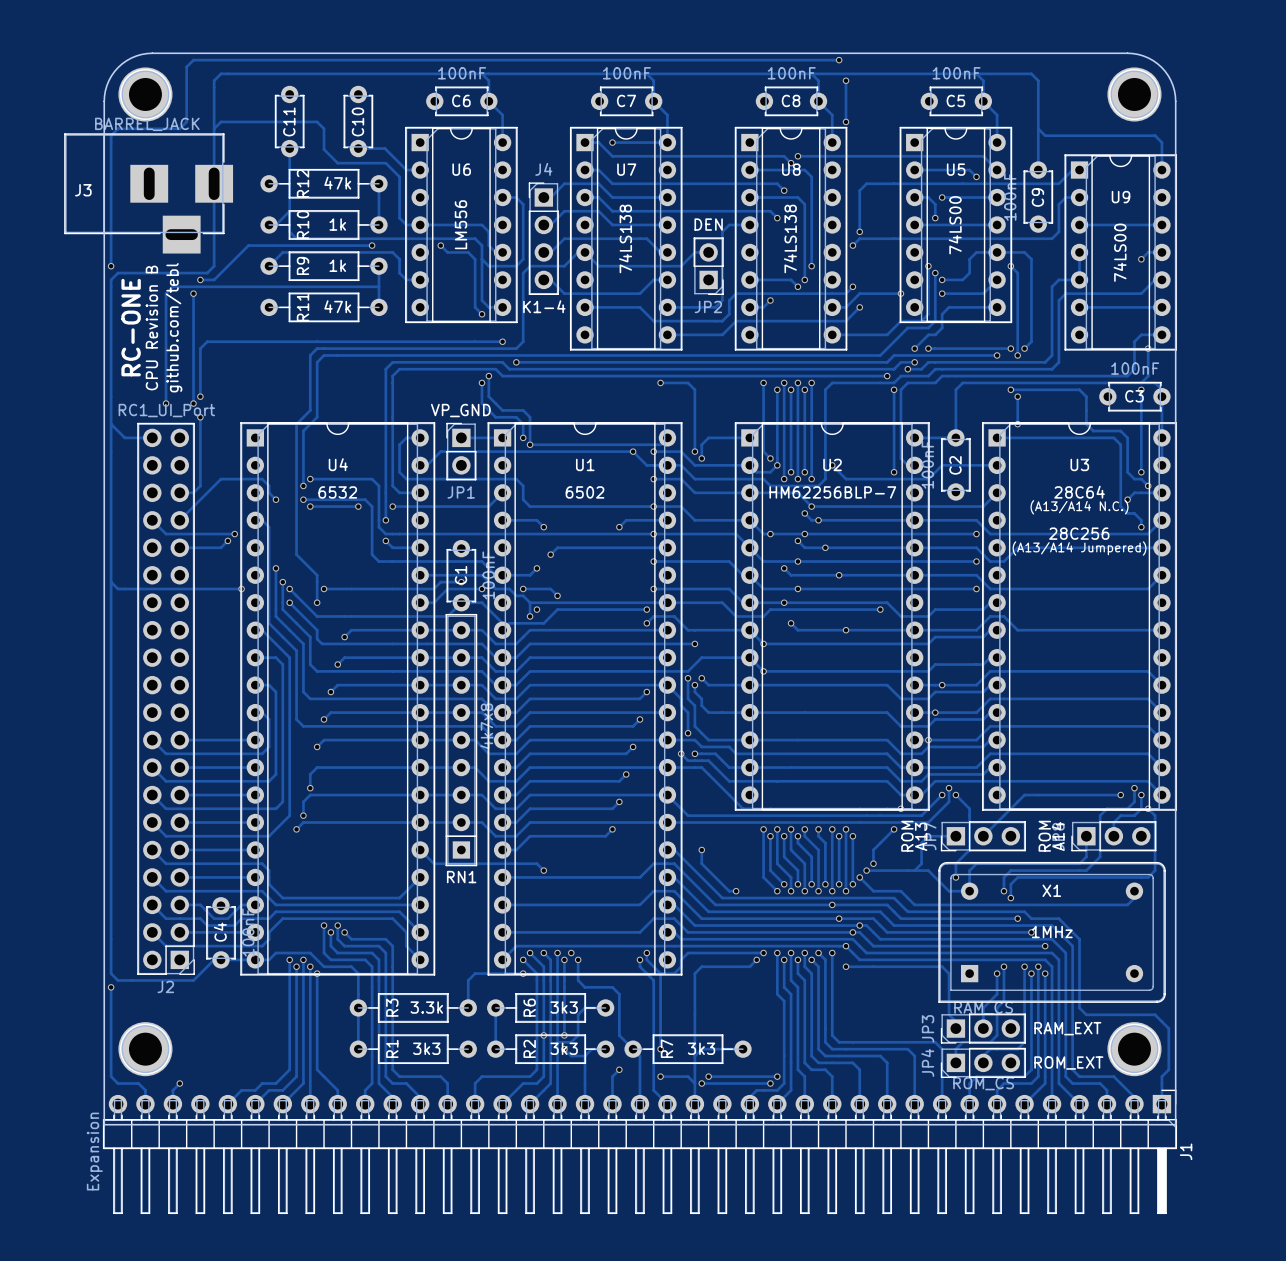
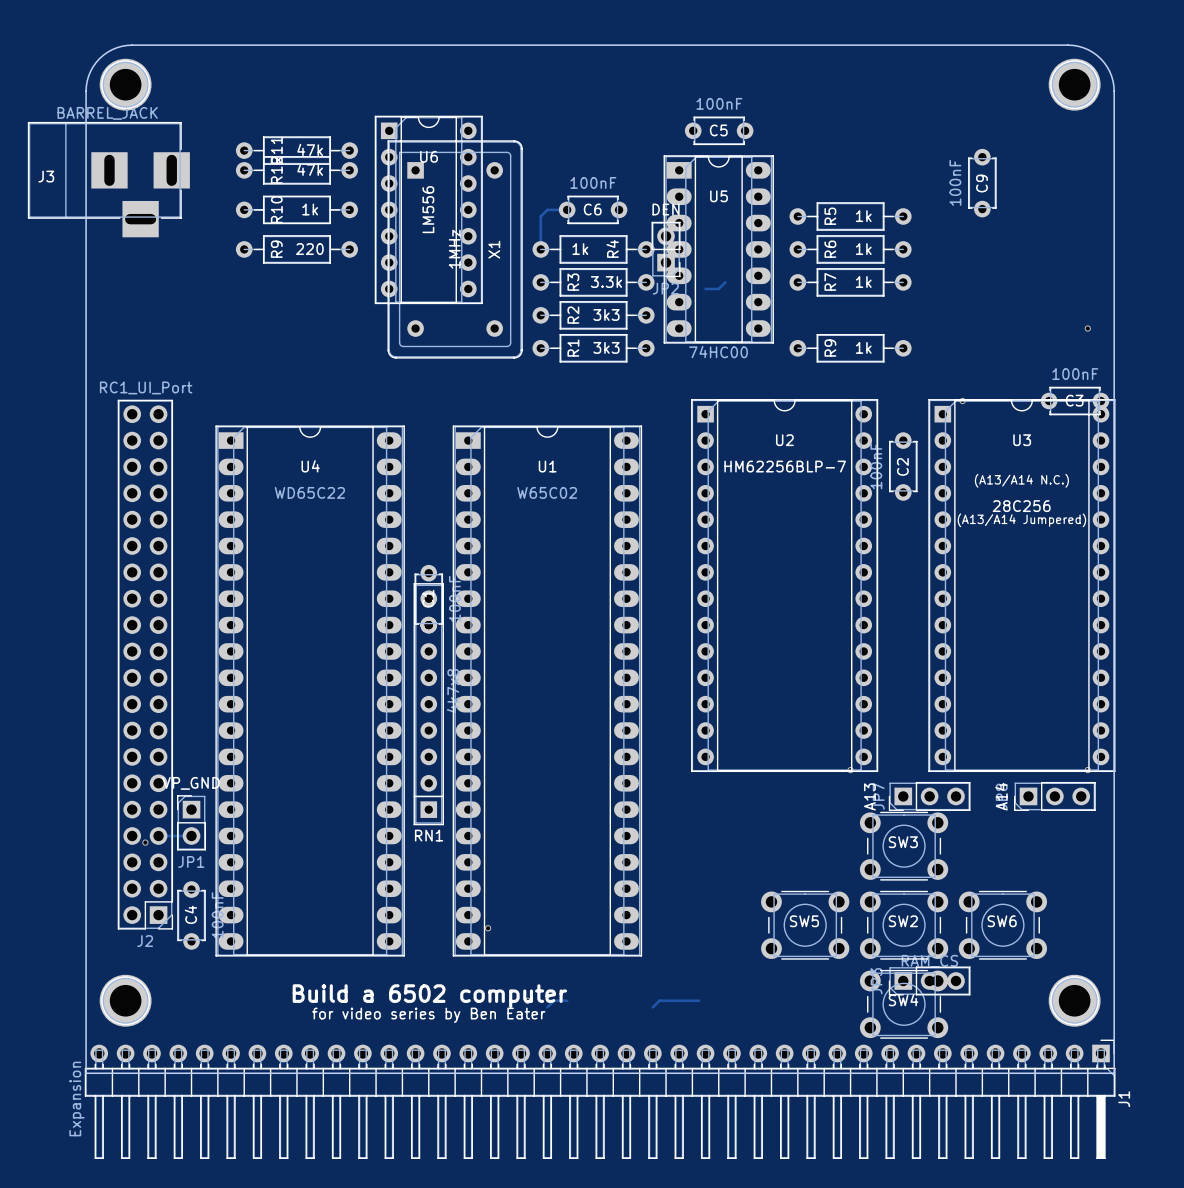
track: (839, 60) (193, 60) (186, 67) (186, 121) (179, 128) (117, 128) (111, 135) (111, 266) -> none
via: (839, 60) -> none
track: (481, 73) (488, 80) (488, 101) (502, 115) (502, 142) -> none
track: (646, 73) (653, 80) (653, 101) (667, 115) (667, 142) (612, 142) -> none
track: (811, 73) (818, 80) (818, 101) (832, 115) (832, 142) -> none
track: (976, 73) (983, 80) (983, 101) (997, 115) (997, 142) -> none
track: (846, 80) (846, 121) -> none
via: (846, 80) -> none
C6 position: (461, 101) -> (593, 209)
C7: 100nF (626, 101) -> none
C8: 100nF (791, 101) -> none
C5 position: (956, 101) -> (719, 130)
C11: (289, 121) -> none
C10: (358, 121) -> none
via: (846, 121) -> none
U5 footprint: [899, 126, 1013, 324] -> [663, 155, 774, 344]
track: (214, 128) (221, 121) (317, 121) (324, 128) (324, 149) (337, 163) (385, 163) (399, 176) (399, 218) (406, 224) (481, 224) (488, 231) (488, 245) (495, 252) (502, 252) -> none
track: (1038, 128) (1045, 135) (1155, 135) (1161, 142) (1161, 170) -> none
track: (585, 142) (598, 142) (612, 156) (784, 156) (791, 163) -> none
via: (612, 142) -> none
track: (289, 148) (289, 231) (296, 238) (475, 238) (481, 245) (481, 300) (488, 307) (502, 307) -> none
track: (358, 148) (384, 148) (406, 170) (420, 170) -> none
track: (797, 156) (983, 156) (997, 170) -> none
via: (797, 156) -> none
via: (791, 163) -> none
track: (585, 170) (598, 170) (612, 183) (777, 183) (784, 190) -> none
track: (749, 170) (804, 170) (811, 176) (811, 266) -> none
track: (914, 170) (969, 170) (976, 176) -> none
track: (1038, 170) (1038, 80) (1031, 73) (221, 73) (214, 80) (214, 266) (207, 273) (117, 273) (111, 279) (111, 973) (117, 980) (193, 980) (214, 959) (269, 959) (275, 953) (310, 953) (324, 966) (351, 966) (358, 973) (358, 1049) -> none
track: (1079, 170) (1072, 170) (1058, 183) (866, 183) (859, 190) (859, 231) -> none
via: (976, 176) -> none
track: (378, 183) (378, 224) -> none
via: (784, 190) -> none
J3 position: (148, 193) -> (108, 179)
track: (502, 197) (516, 197) (523, 204) (523, 259) (516, 266) (488, 266) (481, 259) -> none
track: (543, 197) (550, 197) (564, 183) (598, 183) (612, 197) (667, 197) -> none
track: (585, 197) (598, 197) (612, 211) (770, 211) (777, 218) -> none
track: (749, 197) (797, 197) (804, 204) (804, 279) -> none
track: (914, 197) (928, 197) (935, 204) (935, 218) -> none
track: (942, 197) (997, 197) -> none
via: (942, 197) -> none
track: (1079, 197) (1065, 197) (1058, 204) (1058, 231) (1052, 238) (859, 238) (852, 245) -> none
track: (289, 211) (275, 224) (269, 224) -> none
via: (777, 218) -> none
via: (935, 218) -> none
track: (543, 224) (550, 224) (564, 211) (598, 211) (612, 224) (667, 224) -> none
track: none -> (567, 209) (547, 209) (540, 216) (540, 249)
track: (749, 224) (729, 224) (722, 231) (722, 300) (715, 307) (667, 307) -> none
track: (914, 224) (997, 224) -> none
track: (1079, 224) (1161, 224) -> none
U5 value: 74LS00 (955, 225) -> 74HC00 (718, 352)
via: (859, 231) -> none
R5: none -> 1k (850, 216)
J4: K1-4 (543, 238) -> none
U7: 74LS138 (626, 238) -> none
U8: 74LS138 (791, 238) -> none
track: (372, 245) (248, 245) (214, 279) (200, 279) -> none
via: (372, 245) -> none
track: (440, 245) (447, 252) (468, 252) (475, 259) (475, 307) (481, 314) -> none
via: (440, 245) -> none
via: (852, 245) -> none
track: (543, 252) (550, 252) (564, 238) (646, 238) (660, 252) (667, 252) -> none
track: (708, 252) (694, 252) (681, 266) (598, 266) (585, 252) (578, 252) (564, 266) (530, 266) (523, 273) (523, 341) (516, 348) (317, 348) (310, 355) (310, 410) (296, 424) (296, 554) (317, 575) (317, 602) -> none
track: (1079, 252) (1079, 279) (1058, 279) (1052, 286) (1052, 355) (1045, 362) (928, 362) (921, 369) (907, 369) -> none
U9: 74LS00 (1120, 252) -> none
track: (1161, 252) (1148, 252) (1141, 259) -> none
via: (1141, 259) -> none
R9 value: 1k (337, 265) -> 220 (309, 249)
via: (111, 266) -> none
track: (269, 266) (282, 252) (392, 252) (399, 259) (399, 273) (406, 279) (420, 279) -> none
track: (378, 266) (378, 307) -> none
R4: none -> 1k (593, 249)
via: (811, 266) -> none
track: (928, 266) (928, 314) (921, 321) (900, 321) (887, 334) (832, 334) -> none
via: (928, 266) -> none
track: (1010, 266) (1017, 273) (1017, 355) -> none
via: (1010, 266) -> none
track: (935, 273) (935, 321) (928, 328) (907, 328) (880, 355) (324, 355) (317, 362) (317, 417) (303, 431) (303, 485) -> none
via: (935, 273) -> none
via: (200, 279) -> none
track: (543, 279) (550, 279) (564, 293) (639, 293) (653, 279) (667, 279) -> none
track: (749, 279) (791, 279) (797, 286) -> none
via: (804, 279) -> none
track: (942, 279) (962, 279) (969, 273) (969, 259) (976, 252) (1024, 252) (1031, 259) (1031, 341) (1024, 348) -> none
via: (942, 279) -> none
track: (997, 279) (983, 293) (942, 293) -> none
track: (1161, 279) (1155, 279) (1141, 293) (1065, 293) (1058, 300) (1058, 362) (1052, 369) (935, 369) (928, 376) (900, 376) (894, 382) (832, 382) (825, 389) (825, 479) (818, 485) (770, 485) (763, 479) (694, 479) (681, 465) (646, 465) (633, 451) (440, 451) (427, 465) (420, 465) -> none
track: (378, 286) (172, 286) (166, 293) (166, 403) -> none
via: (797, 286) -> none
track: (852, 286) (846, 293) (736, 293) (729, 300) (729, 314) (722, 321) (653, 321) (639, 307) (585, 307) -> none
via: (852, 286) -> none
track: (193, 293) (193, 403) -> none
via: (193, 293) -> none
track: (900, 293) (859, 293) (846, 307) (832, 307) -> none
via: (900, 293) -> none
via: (942, 293) -> none
via: (770, 300) -> none
R11 position: (324, 307) -> (296, 150)
track: (859, 307) (846, 321) (736, 321) (722, 334) (667, 334) -> none
via: (859, 307) -> none
track: (997, 307) (949, 307) (942, 314) (942, 328) (935, 334) (928, 334) (914, 348) -> none
track: (1079, 307) (1161, 307) -> none
via: (481, 314) -> none
text: RC-ONE (131, 327) -> none
text: github.com/tebl (174, 327) -> none
text: CPU Revision B (151, 328) -> none
track: (1161, 334) (1141, 334) (1134, 341) (1134, 369) (1127, 376) (942, 376) (935, 382) (907, 382) (900, 389) (900, 458) (907, 465) (914, 465) -> none
track: (502, 341) (207, 341) (200, 348) (200, 396) -> none
via: (502, 341) -> none
via: (914, 348) -> none
track: (928, 348) (1010, 348) -> none
via: (928, 348) -> none
via: (1010, 348) -> none
via: (1024, 348) -> none
track: (1148, 348) (1148, 376) (1141, 382) -> none
track: (997, 355) (894, 355) (887, 362) (516, 362) -> none
via: (997, 355) -> none
via: (1017, 355) -> none
via: (516, 362) -> none
track: (914, 362) (900, 362) (894, 369) (509, 369) (502, 362) (392, 362) (385, 369) (385, 520) -> none
via: (914, 362) -> none
R9: none -> 1k (850, 348)
via: (907, 369) -> none
track: (488, 376) (488, 396) (502, 410) (523, 410) (530, 417) (530, 444) (660, 444) (667, 437) -> none
via: (488, 376) -> none
track: (887, 376) (502, 376) (495, 369) (399, 369) (392, 376) (392, 485) (399, 492) (420, 492) -> none
via: (887, 376) -> none
track: (481, 382) (481, 403) (495, 417) (516, 417) (523, 424) (523, 437) -> none
via: (481, 382) -> none
track: (660, 382) (688, 382) (694, 389) (694, 451) -> none
via: (660, 382) -> none
track: (763, 382) (763, 451) (770, 458) -> none
via: (763, 382) -> none
track: (784, 382) (784, 479) -> none
via: (784, 382) -> none
track: (797, 382) (797, 479) -> none
via: (797, 382) -> none
track: (811, 382) (811, 479) -> none
via: (811, 382) -> none
track: (777, 389) (777, 465) (770, 472) (756, 472) (749, 465) (694, 465) (681, 451) (653, 451) -> none
via: (777, 389) -> none
track: (791, 389) (791, 472) -> none
via: (791, 389) -> none
track: (804, 389) (804, 472) -> none
via: (804, 389) -> none
track: (894, 389) (894, 472) -> none
via: (894, 389) -> none
track: (1010, 389) (1079, 389) (1086, 396) (1086, 424) (1093, 431) (1120, 431) (1127, 437) (1127, 472) (1134, 479) (1141, 479) (1148, 485) -> none
via: (1010, 389) -> none
track: (1141, 389) (1141, 472) -> none
via: (1141, 389) -> none
via: (200, 396) -> none
track: (1017, 396) (1017, 424) -> none
via: (1017, 396) -> none
C3 position: (1134, 396) -> (1075, 401)
via: (166, 403) -> none
via: (193, 403) -> none
track: (200, 417) (200, 485) (193, 492) (179, 492) -> none
via: (200, 417) -> none
U4 footprint: [240, 422, 436, 976] -> [215, 425, 405, 957]
U1 footprint: [487, 422, 683, 976] -> [452, 425, 643, 957]
track: (111, 424) (124, 437) (152, 437) -> none
track: (420, 437) (406, 437) (399, 444) (399, 472) (406, 479) (516, 479) (523, 485) (523, 499) (530, 506) (681, 506) (694, 520) (749, 520) (763, 534) (976, 534) -> none
track: (461, 437) (502, 437) -> none
via: (523, 437) -> none
track: (749, 437) (708, 437) (701, 444) (701, 458) -> none
track: (914, 437) (955, 437) (955, 389) (962, 382) (1155, 382) (1161, 389) (1161, 465) -> none
track: (997, 437) (1113, 437) (1120, 444) (1120, 506) (1127, 513) (1134, 513) (1141, 520) (1141, 527) -> none
via: (530, 444) -> none
JP1 position: (461, 451) -> (191, 822)
via: (633, 451) -> none
via: (653, 451) -> none
via: (694, 451) -> none
via: (701, 458) -> none
via: (770, 458) -> none
C2 position: (955, 464) -> (903, 466)
via: (777, 465) -> none
track: (832, 465) (846, 479) (928, 479) (942, 465) (997, 465) -> none
via: (832, 465) -> none
via: (791, 472) -> none
via: (804, 472) -> none
via: (894, 472) -> none
via: (1141, 472) -> none
track: (310, 479) (372, 479) (378, 485) (378, 527) (385, 534) (736, 534) (763, 561) (976, 561) -> none
via: (310, 479) -> none
track: (653, 479) (681, 479) (694, 492) (797, 492) (811, 506) (983, 506) (997, 492) -> none
via: (653, 479) -> none
via: (784, 479) -> none
via: (797, 479) -> none
via: (811, 479) -> none
via: (303, 485) -> none
via: (1148, 485) -> none
U4 value: 6532 (337, 492) -> WD65C22 (309, 492)
track: (502, 492) (488, 506) (392, 506) -> none
U1 value: 6502 (585, 492) -> W65C02 (547, 492)
text: 28C64 (1079, 492) -> none
track: (1161, 492) (1134, 492) (1127, 499) -> none
track: (275, 499) (269, 492) (269, 485) (262, 479) (221, 479) (179, 520) -> none
via: (275, 499) -> none
track: (303, 499) (365, 499) (372, 506) (372, 554) (378, 561) (481, 561) (495, 575) (530, 575) (536, 568) -> none
via: (303, 499) -> none
via: (1127, 499) -> none
track: (310, 506) (358, 506) -> none
via: (310, 506) -> none
via: (358, 506) -> none
via: (392, 506) -> none
via: (653, 506) -> none
via: (811, 506) -> none
track: (804, 513) (811, 520) (976, 520) (990, 534) (1148, 534) (1161, 520) -> none
via: (804, 513) -> none
track: (152, 520) (166, 534) (234, 534) -> none
track: (255, 520) (262, 520) (269, 527) (269, 623) (296, 650) (296, 719) (303, 726) (481, 726) (495, 740) (516, 740) (530, 726) (633, 726) (639, 719) -> none
via: (385, 520) -> none
track: (502, 520) (536, 520) (543, 527) -> none
track: (667, 520) (626, 520) (619, 527) -> none
via: (818, 520) -> none
via: (543, 527) -> none
via: (619, 527) -> none
via: (1141, 527) -> none
via: (234, 534) -> none
via: (653, 534) -> none
via: (770, 534) -> none
via: (804, 534) -> none
via: (976, 534) -> none
track: (227, 540) (221, 547) (179, 547) -> none
via: (227, 540) -> none
track: (385, 540) (392, 547) (420, 547) -> none
via: (385, 540) -> none
track: (797, 540) (804, 547) (976, 547) (990, 561) (1003, 561) (1017, 547) (1161, 547) -> none
via: (797, 540) -> none
track: (667, 547) (557, 547) (550, 554) -> none
via: (825, 547) -> none
via: (550, 554) -> none
track: (653, 561) (729, 561) (742, 575) (749, 575) (763, 588) (976, 588) -> none
via: (653, 561) -> none
via: (797, 561) -> none
via: (976, 561) -> none
track: (275, 568) (275, 616) (303, 643) (303, 692) (310, 698) (481, 698) (495, 712) (516, 712) (530, 698) (639, 698) (646, 692) -> none
via: (275, 568) -> none
via: (536, 568) -> none
track: (784, 568) (791, 575) (976, 575) (990, 588) (1148, 588) (1161, 575) -> none
via: (784, 568) -> none
track: (420, 575) (481, 575) (495, 588) (509, 588) (516, 595) (523, 595) (530, 602) -> none
C1 position: (461, 575) -> (428, 599)
via: (839, 575) -> none
track: (111, 582) (117, 588) (241, 588) -> none
track: (282, 582) (282, 609) (310, 637) (310, 664) (317, 671) (481, 671) (495, 685) (516, 685) (530, 671) (688, 671) (701, 657) (749, 657) (763, 671) (928, 671) (935, 664) (983, 664) (990, 657) (997, 657) -> none
via: (282, 582) -> none
track: (461, 582) (440, 582) (433, 588) (324, 588) -> none
via: (461, 582) -> none
via: (241, 588) -> none
track: (289, 588) (317, 616) (447, 616) (461, 602) (481, 602) (502, 623) (502, 630) (509, 623) (543, 623) (557, 609) (646, 609) -> none
via: (289, 588) -> none
via: (324, 588) -> none
track: (481, 588) (447, 588) (433, 602) (420, 602) -> none
via: (481, 588) -> none
track: (523, 588) (550, 588) (557, 595) -> none
via: (523, 588) -> none
track: (653, 588) (729, 588) (742, 602) (887, 602) (900, 616) (928, 616) (935, 609) (983, 609) (990, 602) (997, 602) -> none
via: (653, 588) -> none
via: (797, 588) -> none
via: (976, 588) -> none
via: (557, 595) -> none
track: (289, 602) (317, 630) (317, 639) (322, 643) (481, 643) (495, 657) (516, 657) (530, 643) (694, 643) -> none
via: (289, 602) -> none
via: (317, 602) -> none
track: (530, 602) (722, 602) (736, 616) (763, 616) (770, 609) (880, 609) -> none
track: (530, 602) (530, 616) -> none
via: (784, 602) -> none
via: (536, 609) -> none
via: (646, 609) -> none
via: (880, 609) -> none
via: (530, 616) -> none
track: (646, 623) (653, 616) (674, 616) (688, 630) (749, 630) (763, 643) (928, 643) (935, 637) (983, 637) (990, 630) (997, 630) -> none
via: (646, 623) -> none
track: (791, 623) (797, 630) (976, 630) (990, 616) (1003, 616) (1017, 630) (1161, 630) -> none
via: (791, 623) -> none
track: (255, 630) (262, 630) (289, 657) (289, 815) (269, 836) (166, 836) (152, 822) -> none
track: (667, 630) (530, 630) (516, 643) (495, 643) (481, 630) (351, 630) (344, 637) -> none
via: (846, 630) -> none
via: (344, 637) -> none
via: (694, 643) -> none
via: (763, 643) -> none
track: (255, 657) (275, 657) (282, 664) (282, 801) (275, 808) (166, 808) (152, 795) -> none
track: (667, 657) (530, 657) (516, 671) (495, 671) (481, 657) (344, 657) (337, 664) -> none
via: (337, 664) -> none
via: (763, 671) -> none
track: (688, 678) (688, 698) (694, 705) (694, 726) (708, 740) (887, 740) (900, 753) (921, 753) (928, 746) (983, 746) (990, 740) (997, 740) -> none
via: (688, 678) -> none
track: (701, 678) (708, 685) (887, 685) (900, 698) (928, 698) (935, 692) (983, 692) (990, 685) (997, 685) -> none
via: (701, 678) -> none
track: (255, 685) (269, 685) (275, 692) (275, 774) (269, 781) (166, 781) (152, 767) -> none
track: (694, 685) (694, 692) (701, 698) (701, 705) (708, 712) (887, 712) (900, 726) (928, 726) (935, 719) (983, 719) (990, 712) (997, 712) -> none
via: (694, 685) -> none
track: (914, 685) (976, 685) (990, 671) (1148, 671) (1161, 685) -> none
via: (942, 685) -> none
track: (330, 692) (337, 685) (481, 685) (495, 698) (516, 698) (530, 685) (667, 685) (681, 698) (681, 705) (688, 712) (688, 733) -> none
via: (330, 692) -> none
via: (646, 692) -> none
track: (255, 712) (262, 712) (269, 719) (269, 746) (262, 753) (166, 753) (152, 740) -> none
track: (667, 712) (530, 712) (516, 726) (495, 726) (481, 712) (330, 712) (324, 719) -> none
track: (914, 712) (976, 712) (990, 698) (1148, 698) (1161, 712) -> none
via: (935, 712) -> none
via: (324, 719) -> none
via: (639, 719) -> none
via: (688, 733) -> none
track: (179, 740) (255, 740) -> none
track: (914, 740) (976, 740) (990, 726) (1148, 726) (1161, 740) -> none
via: (928, 740) -> none
track: (317, 746) (324, 740) (475, 740) (488, 753) (516, 753) (530, 740) (694, 740) (701, 746) (729, 746) (736, 753) (887, 753) (900, 767) (976, 767) (990, 753) (1148, 753) (1161, 767) -> none
via: (317, 746) -> none
track: (633, 746) (626, 753) (530, 753) (516, 767) (502, 767) -> none
via: (633, 746) -> none
track: (681, 753) (688, 760) (708, 760) (729, 781) (887, 781) (900, 795) (921, 795) (935, 781) (1148, 781) (1161, 795) -> none
via: (681, 753) -> none
track: (694, 753) (715, 753) (729, 767) (887, 767) (900, 781) (921, 781) (928, 774) (983, 774) (990, 767) (997, 767) -> none
via: (694, 753) -> none
track: (179, 767) (255, 767) -> none
track: (626, 774) (619, 781) (530, 781) (516, 795) (502, 795) -> none
via: (626, 774) -> none
track: (310, 788) (310, 774) (317, 767) (475, 767) (488, 781) (516, 781) (530, 767) (701, 767) (742, 808) (900, 808) -> none
via: (310, 788) -> none
track: (949, 788) (949, 801) (928, 822) (530, 822) (516, 836) (495, 836) (481, 822) (303, 822) (296, 829) -> none
via: (949, 788) -> none
track: (1134, 788) (1134, 801) (1127, 808) (1107, 808) (1100, 815) (1100, 856) (1086, 870) (1010, 870) (1003, 877) (1003, 891) -> none
via: (1134, 788) -> none
track: (179, 795) (255, 795) -> none
track: (942, 795) (921, 815) (688, 815) (667, 795) (530, 795) (516, 808) (495, 808) (481, 795) (310, 795) (303, 801) (303, 815) -> none
via: (942, 795) -> none
track: (955, 795) (969, 808) (969, 849) (955, 863) (955, 877) -> none
via: (955, 795) -> none
track: (1120, 795) (1024, 795) (983, 836) -> none
via: (1120, 795) -> none
track: (1141, 795) (1141, 808) (1134, 815) (1120, 815) (1113, 822) (1113, 836) -> none
via: (1141, 795) -> none
track: (619, 801) (612, 808) (530, 808) (516, 822) (502, 822) -> none
via: (619, 801) -> none
track: (1148, 808) (1155, 815) (1155, 870) (1148, 877) (1017, 877) (1010, 884) (1010, 898) -> none
via: (303, 815) -> none
track: (179, 822) (255, 822) -> none
via: (296, 829) -> none
track: (612, 829) (605, 836) (530, 836) (516, 849) (502, 849) -> none
via: (612, 829) -> none
track: (763, 829) (763, 877) (777, 891) -> none
via: (763, 829) -> none
track: (777, 829) (777, 863) (791, 877) (791, 891) -> none
via: (777, 829) -> none
track: (791, 829) (791, 849) (804, 863) (804, 891) -> none
via: (791, 829) -> none
track: (804, 829) (804, 836) (818, 849) (818, 891) -> none
via: (804, 829) -> none
track: (818, 829) (818, 836) (825, 843) (825, 884) -> none
via: (818, 829) -> none
track: (832, 829) (832, 891) -> none
via: (832, 829) -> none
track: (846, 829) (846, 891) -> none
via: (846, 829) -> none
track: (894, 829) (873, 849) (873, 863) -> none
via: (894, 829) -> none
track: (770, 836) (770, 870) (784, 884) -> none
via: (770, 836) -> none
track: (784, 836) (784, 856) (797, 870) (797, 884) -> none
via: (784, 836) -> none
track: (797, 836) (797, 843) (811, 856) (811, 884) -> none
via: (797, 836) -> none
track: (839, 836) (839, 884) -> none
via: (839, 836) -> none
track: (852, 836) (852, 884) -> none
via: (852, 836) -> none
text: ROM (907, 836) -> none
track: (955, 836) (928, 836) (921, 843) (921, 863) (914, 870) -> none
text: ROM (1044, 836) -> none
track: (1086, 836) (1086, 856) (1079, 863) (976, 863) (969, 870) (969, 891) (949, 891) (928, 870) (866, 870) -> none
track: (152, 849) (166, 863) (262, 863) (269, 870) (269, 884) (282, 898) (399, 898) (420, 877) (413, 877) -> none
track: (179, 849) (255, 849) -> none
track: (420, 849) (433, 863) (536, 863) (543, 870) -> none
track: (667, 849) (674, 849) (722, 898) (894, 898) (907, 911) (1024, 911) (1031, 918) (1058, 918) (1079, 939) (1079, 1007) (1086, 1014) (1155, 1014) (1168, 1028) (1168, 1069) (1161, 1076) (1161, 1104) -> none
track: (701, 849) (701, 863) (729, 891) (736, 891) -> none
via: (701, 849) -> none
via: (873, 863) -> none
via: (543, 870) -> none
via: (866, 870) -> none
track: (152, 877) (166, 891) (262, 891) (275, 904) (420, 904) -> none
track: (214, 877) (255, 877) -> none
track: (502, 877) (639, 877) (653, 863) (674, 863) (715, 904) (887, 904) (900, 918) (1017, 918) -> none
track: (667, 877) (674, 877) (708, 911) (880, 911) (894, 925) (1052, 925) (1072, 946) (1072, 1069) (1079, 1076) (1113, 1076) (1134, 1097) (1134, 1104) -> none
track: (859, 877) (873, 891) (900, 891) (914, 904) (1127, 904) (1134, 898) (1134, 891) -> none
via: (859, 877) -> none
via: (955, 877) -> none
via: none -> (145, 842)
via: (784, 884) -> none
via: (797, 884) -> none
via: (811, 884) -> none
via: (825, 884) -> none
via: (839, 884) -> none
via: (852, 884) -> none
SW3: none -> (904, 846)
via: (736, 891) -> none
via: (777, 891) -> none
via: (791, 891) -> none
via: (804, 891) -> none
via: (818, 891) -> none
via: (832, 891) -> none
via: (846, 891) -> none
via: (1003, 891) -> none
track: (152, 898) (152, 904) (166, 918) (200, 918) (207, 925) (234, 925) (241, 918) (269, 918) (275, 911) (399, 911) (420, 932) (413, 932) -> none
via: (1010, 898) -> none
track: (179, 904) (200, 904) (214, 918) (227, 918) (241, 904) (255, 904) -> none
track: (502, 904) (639, 904) (653, 891) (674, 891) (701, 918) (873, 918) (887, 932) (1031, 932) -> none
track: (667, 904) (674, 904) (694, 925) (866, 925) (880, 939) (1052, 939) (1065, 953) (1065, 1076) (1072, 1083) (1100, 1083) (1107, 1090) (1107, 1104) -> none
via: (832, 904) -> none
via: (839, 918) -> none
via: (1017, 918) -> none
track: (324, 925) (324, 953) (330, 959) (365, 959) (372, 966) (372, 1083) (365, 1090) (365, 1104) -> none
via: (324, 925) -> none
track: (337, 925) (337, 939) (344, 946) (378, 946) (385, 953) (385, 1076) (392, 1083) (406, 1083) (420, 1097) (420, 1104) -> none
via: (337, 925) -> none
via: (859, 925) -> none
track: (179, 932) (255, 932) (255, 939) -> none
C4 position: (221, 932) -> (191, 915)
track: (330, 932) (330, 946) (337, 953) (372, 953) (378, 959) (378, 1083) (392, 1097) (392, 1104) -> none
via: (330, 932) -> none
track: (344, 932) (351, 939) (385, 939) (392, 946) (392, 1069) (399, 1076) (440, 1076) (447, 1083) (447, 1104) -> none
via: (344, 932) -> none
track: (502, 932) (639, 932) (653, 918) (674, 918) (688, 932) (859, 932) (873, 946) (1045, 946) -> none
track: (667, 932) (674, 932) (681, 939) (852, 939) (866, 953) (1052, 953) (1058, 959) (1058, 1083) (1079, 1104) -> none
via: (852, 932) -> none
via: (1031, 932) -> none
X1 rotation: 0° (1052, 932) -> 90° clockwise (455, 249)
X1 position: (1052, 932) -> (455, 249)
track: (152, 939) (152, 932) (166, 946) (262, 946) (269, 939) (269, 932) (282, 918) (392, 918) (406, 932) (406, 946) (420, 959) (413, 959) -> none
via: (846, 946) -> none
via: (1045, 946) -> none
track: (530, 953) (543, 966) (543, 1076) (536, 1083) (523, 1083) (502, 1104) -> none
via: (530, 953) -> none
track: (543, 953) (550, 959) (550, 1083) (530, 1104) -> none
via: (543, 953) -> none
track: (557, 953) (557, 1104) -> none
via: (557, 953) -> none
via: (571, 953) -> none
track: (646, 953) (646, 959) (660, 973) -> none
via: (646, 953) -> none
track: (763, 953) (688, 953) (681, 959) (681, 966) (674, 973) (660, 973) -> none
via: (763, 953) -> none
track: (777, 953) (777, 994) (784, 1001) (784, 1083) (777, 1090) (756, 1090) (749, 1097) (749, 1104) -> none
via: (777, 953) -> none
track: (791, 953) (791, 980) (797, 987) (797, 1069) (804, 1076) (804, 1104) -> none
via: (791, 953) -> none
track: (804, 953) (804, 966) (811, 973) (811, 1056) (818, 1062) (852, 1062) (859, 1069) (859, 1104) -> none
via: (804, 953) -> none
track: (818, 953) (825, 959) (825, 1042) (832, 1049) (907, 1049) (914, 1056) (914, 1104) -> none
via: (818, 953) -> none
track: (832, 953) (832, 1035) (839, 1042) (935, 1042) (942, 1049) (942, 1104) -> none
via: (832, 953) -> none
track: (289, 959) (289, 1069) (275, 1083) (262, 1083) (255, 1090) (241, 1090) (227, 1104) -> none
via: (289, 959) -> none
track: (303, 959) (303, 1083) (282, 1104) -> none
via: (303, 959) -> none
track: (502, 959) (516, 946) (846, 946) (859, 959) (1045, 959) (1052, 966) (1052, 1104) -> none
track: (523, 959) (536, 973) (536, 1069) (530, 1076) (481, 1076) (475, 1083) (475, 1104) -> none
via: (523, 959) -> none
track: (564, 959) (564, 1035) -> none
via: (564, 959) -> none
track: (578, 959) (578, 980) (585, 987) (612, 987) (619, 994) (619, 1035) (639, 1056) (639, 1104) -> none
via: (578, 959) -> none
track: (639, 959) (639, 966) (653, 980) (653, 1090) (667, 1104) -> none
via: (639, 959) -> none
track: (756, 959) (749, 966) (701, 966) (694, 973) (694, 1104) -> none
via: (756, 959) -> none
track: (784, 959) (784, 987) (791, 994) (791, 1090) (777, 1104) -> none
via: (784, 959) -> none
track: (797, 959) (797, 973) (804, 980) (804, 1062) (811, 1069) (825, 1069) (832, 1076) (832, 1104) -> none
via: (797, 959) -> none
track: (811, 959) (818, 966) (818, 1049) (825, 1056) (880, 1056) (887, 1062) (887, 1104) -> none
via: (811, 959) -> none
track: (296, 966) (296, 1076) (282, 1090) (269, 1090) (255, 1104) -> none
via: (296, 966) -> none
track: (310, 966) (310, 1104) -> none
via: (310, 966) -> none
track: (846, 966) (942, 966) (949, 973) (949, 1014) (955, 1021) (955, 1028) -> none
via: (846, 966) -> none
track: (1003, 966) (1003, 1001) (997, 1007) (997, 1035) (990, 1042) (962, 1042) (955, 1049) (955, 1062) -> none
via: (1003, 966) -> none
track: (1024, 966) (1024, 1042) (1017, 1049) (990, 1049) (983, 1056) (983, 1062) -> none
via: (1024, 966) -> none
track: (1038, 966) (1038, 1076) (1031, 1083) (1003, 1083) (997, 1090) (997, 1104) -> none
via: (1038, 966) -> none
SW5: none -> (805, 925)
SW2: none -> (904, 925)
SW6: none -> (1002, 925)
track: (317, 973) (317, 1069) (337, 1090) (337, 1104) -> none
via: (317, 973) -> none
track: (523, 973) (475, 973) (468, 980) (468, 1007) -> none
track: (660, 973) (660, 1049) -> none
track: (997, 973) (997, 994) (983, 1007) (983, 1028) -> none
via: (997, 973) -> none
track: (1031, 973) (1031, 1069) (1024, 1076) (976, 1076) (969, 1083) (969, 1104) -> none
via: (1031, 973) -> none
track: (1045, 973) (1045, 1083) (1024, 1104) (1024, 1097) -> none
via: (1045, 973) -> none
track: (111, 987) (111, 1076) (117, 1083) (138, 1083) (145, 1090) (145, 1104) -> none
via: (111, 987) -> none
R3 position: (413, 1007) -> (593, 282)
track: (495, 1007) (495, 1049) -> none
R6 position: (550, 1007) -> (850, 249)
R6 value: 3k3 (564, 1007) -> 1k (863, 249)
track: (605, 1007) (585, 1007) (578, 1014) (578, 1035) (571, 1042) (557, 1042) -> none
text: RAM_EXT (1067, 1028) -> none
via: (543, 1035) -> none
via: (564, 1035) -> none
text: none -> Build a 6502 computer (429, 996)
R7 value: 3k3 (701, 1048) -> 1k (863, 282)
R1 position: (413, 1049) -> (593, 348)
R2 position: (550, 1049) -> (593, 315)
track: (564, 1049) (571, 1056) (585, 1056) (585, 1104) -> none
via: (660, 1049) -> none
R7 position: (688, 1049) -> (850, 282)
SW4: none -> (904, 1004)
JP4: ROM_CS (983, 1062) -> none
text: ROM_EXT (1068, 1063) -> none
text: none -> for video series by Ben Eater (428, 1015)
track: (619, 1069) (612, 1076) (612, 1104) -> none
via: (619, 1069) -> none
track: (660, 1076) (688, 1076) (694, 1083) -> none
via: (660, 1076) -> none
track: (708, 1076) (777, 1076) -> none
via: (708, 1076) -> none
via: (777, 1076) -> none
track: (179, 1083) (172, 1090) (172, 1104) -> none
via: (179, 1083) -> none
track: (701, 1083) (770, 1083) -> none
via: (701, 1083) -> none
via: (770, 1083) -> none

